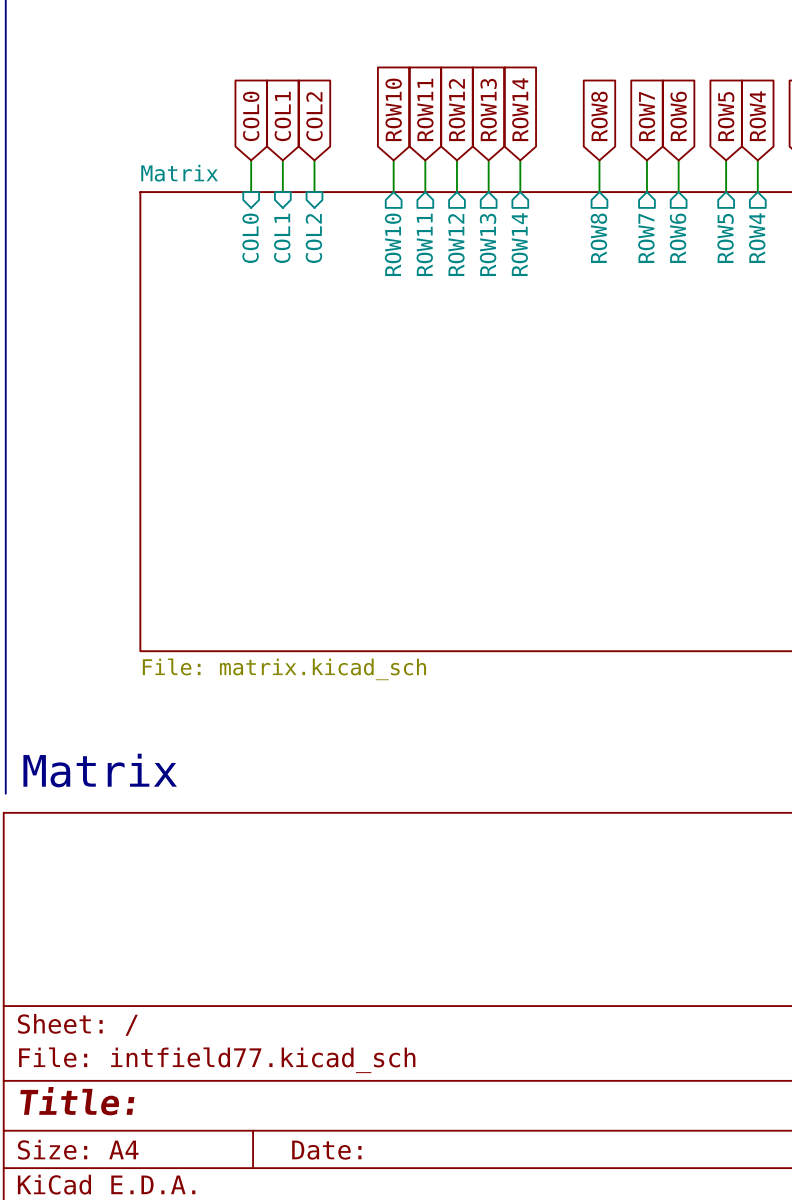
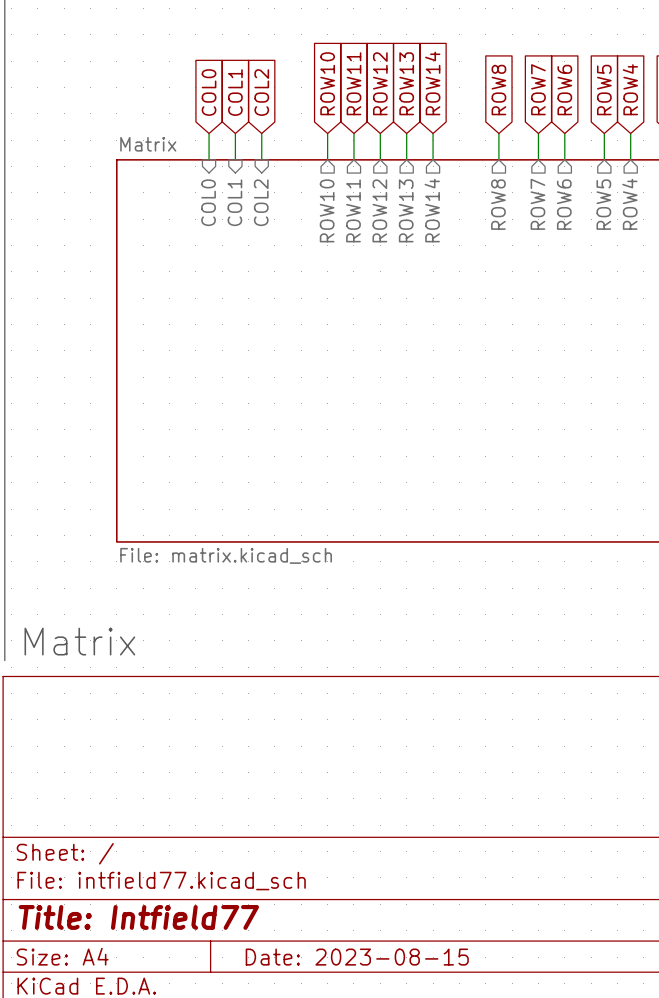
title block: Title: (77, 1101) -> Title: Intfield77 (138, 917)
title block: Date: (326, 1150) -> Date: 2023-08-15 (357, 957)

